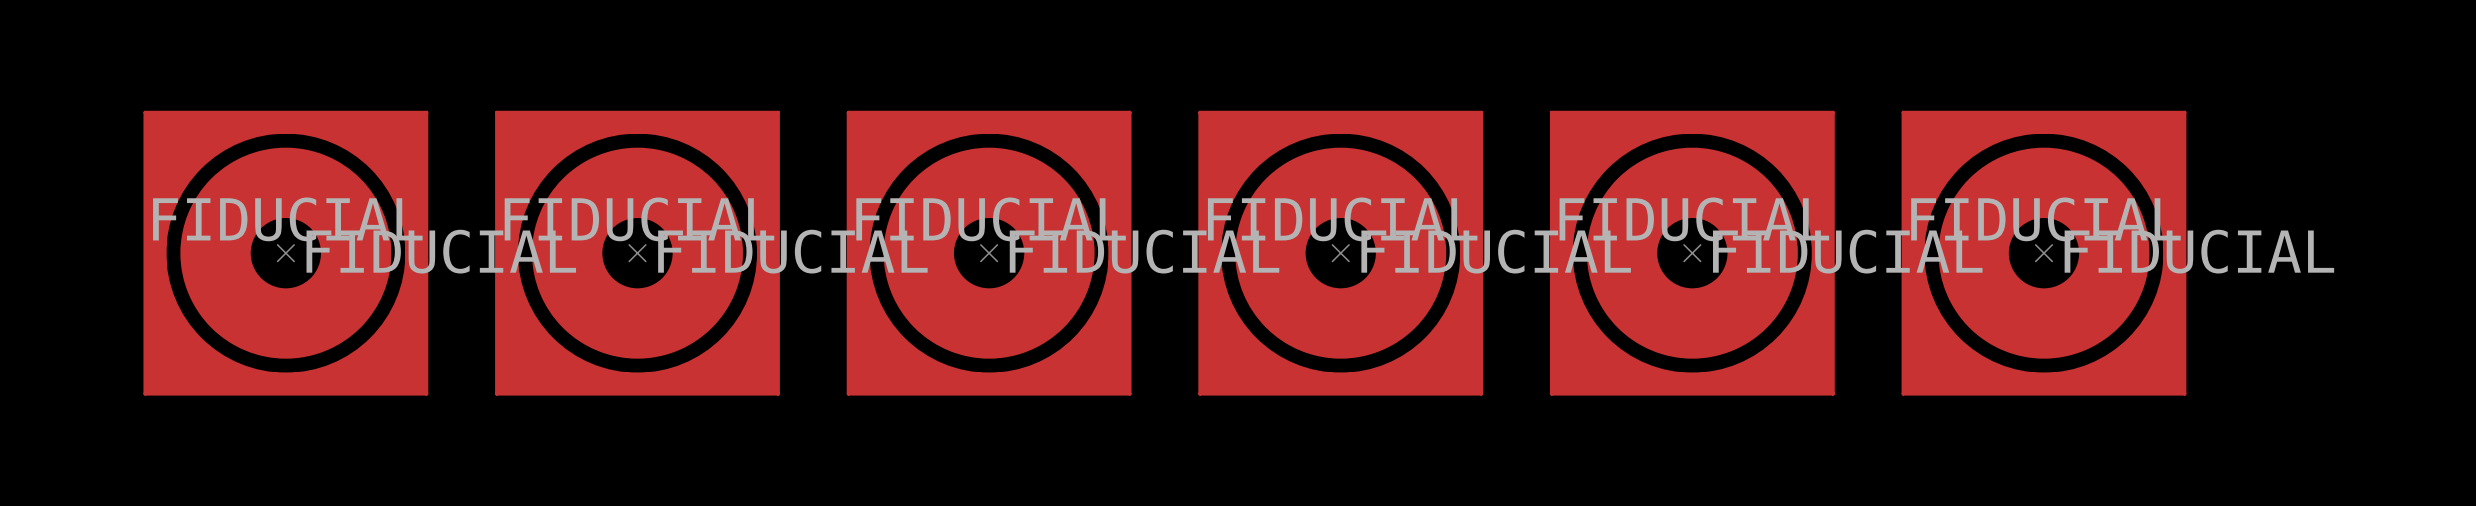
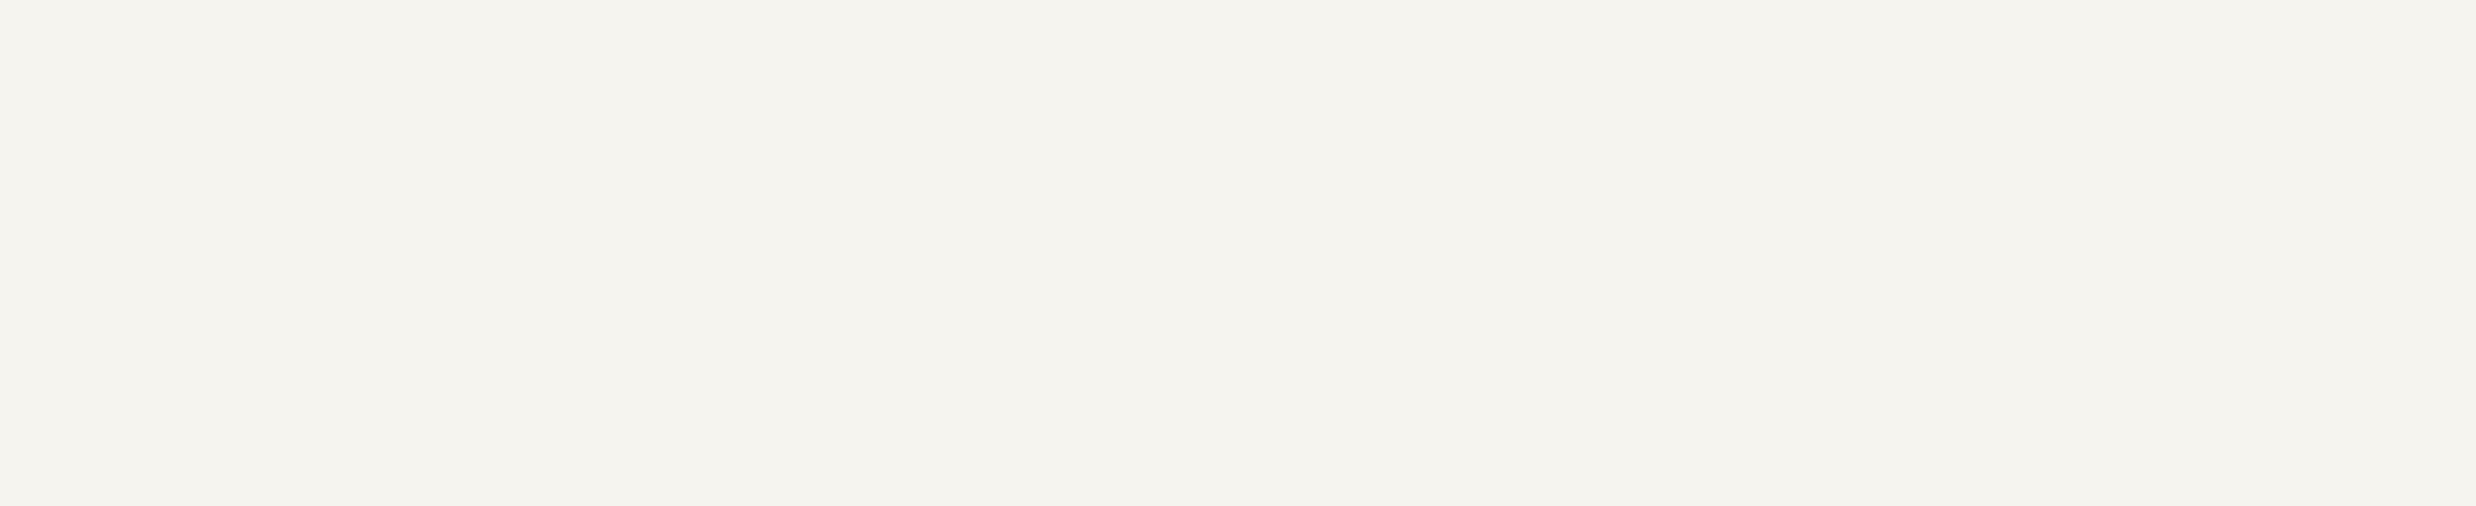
part: (285, 253) -> none
part: (637, 253) -> none
part: (989, 253) -> none
part: (1340, 253) -> none
part: (1692, 253) -> none
part: (2043, 253) -> none

